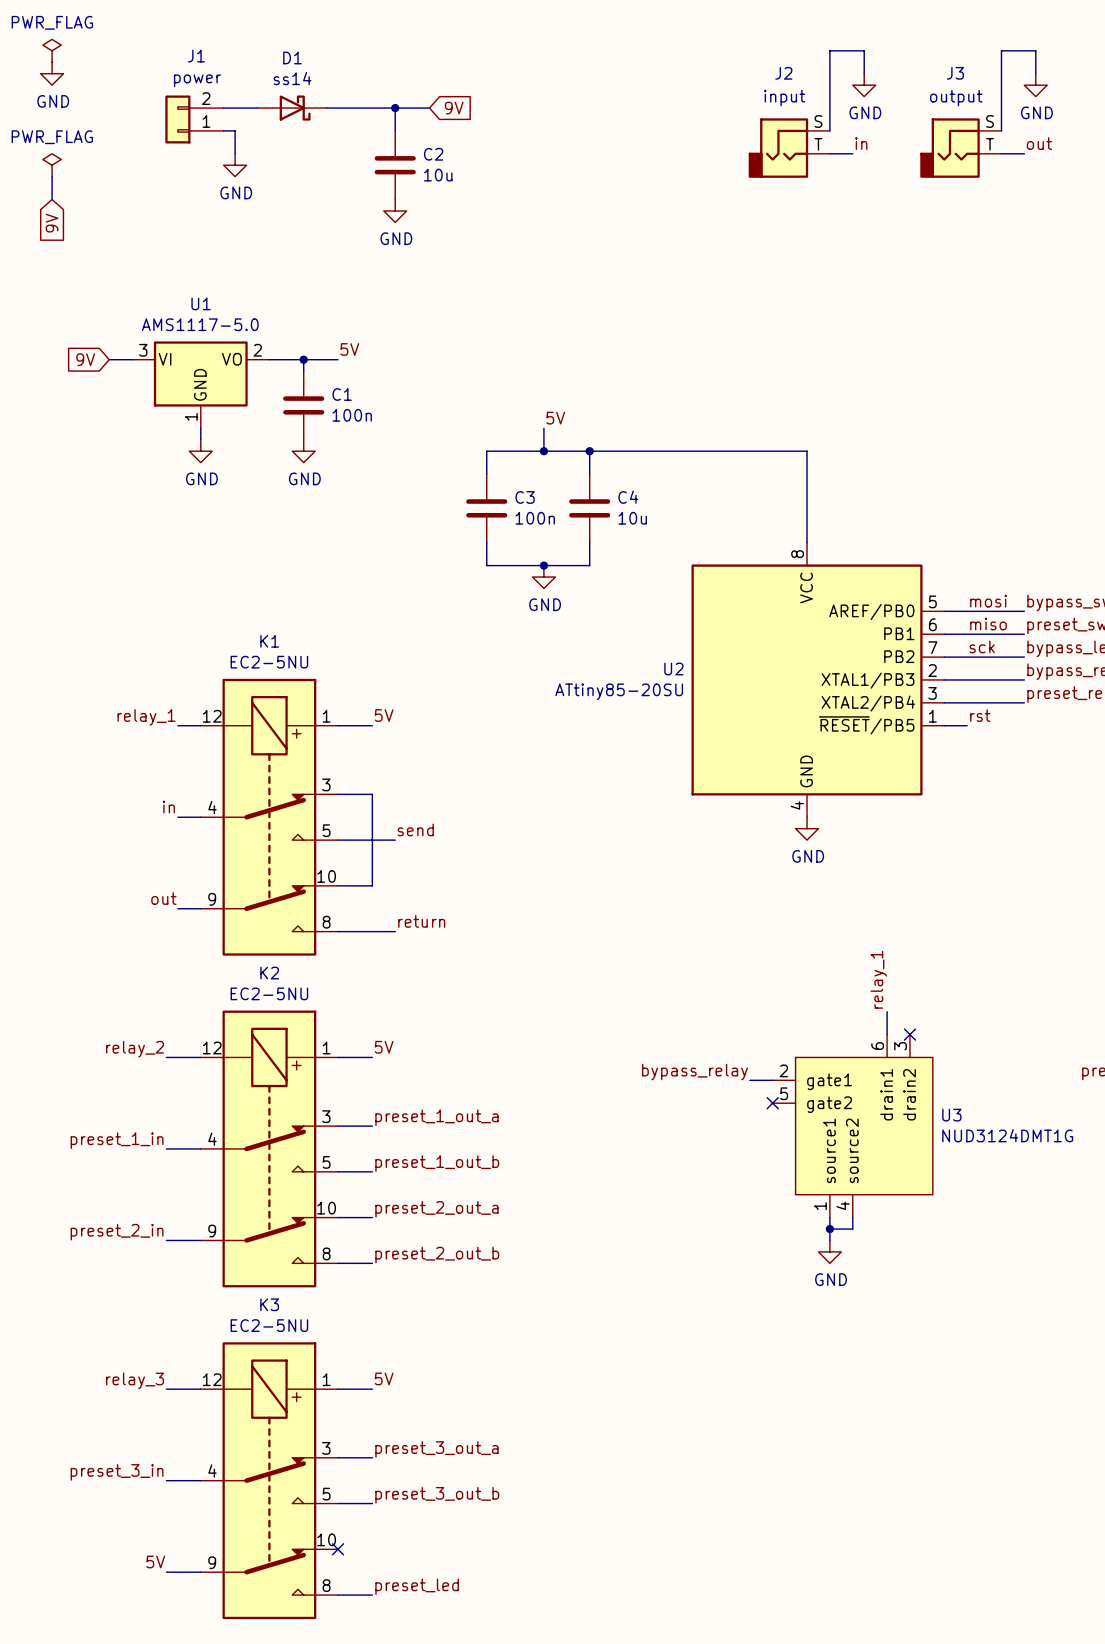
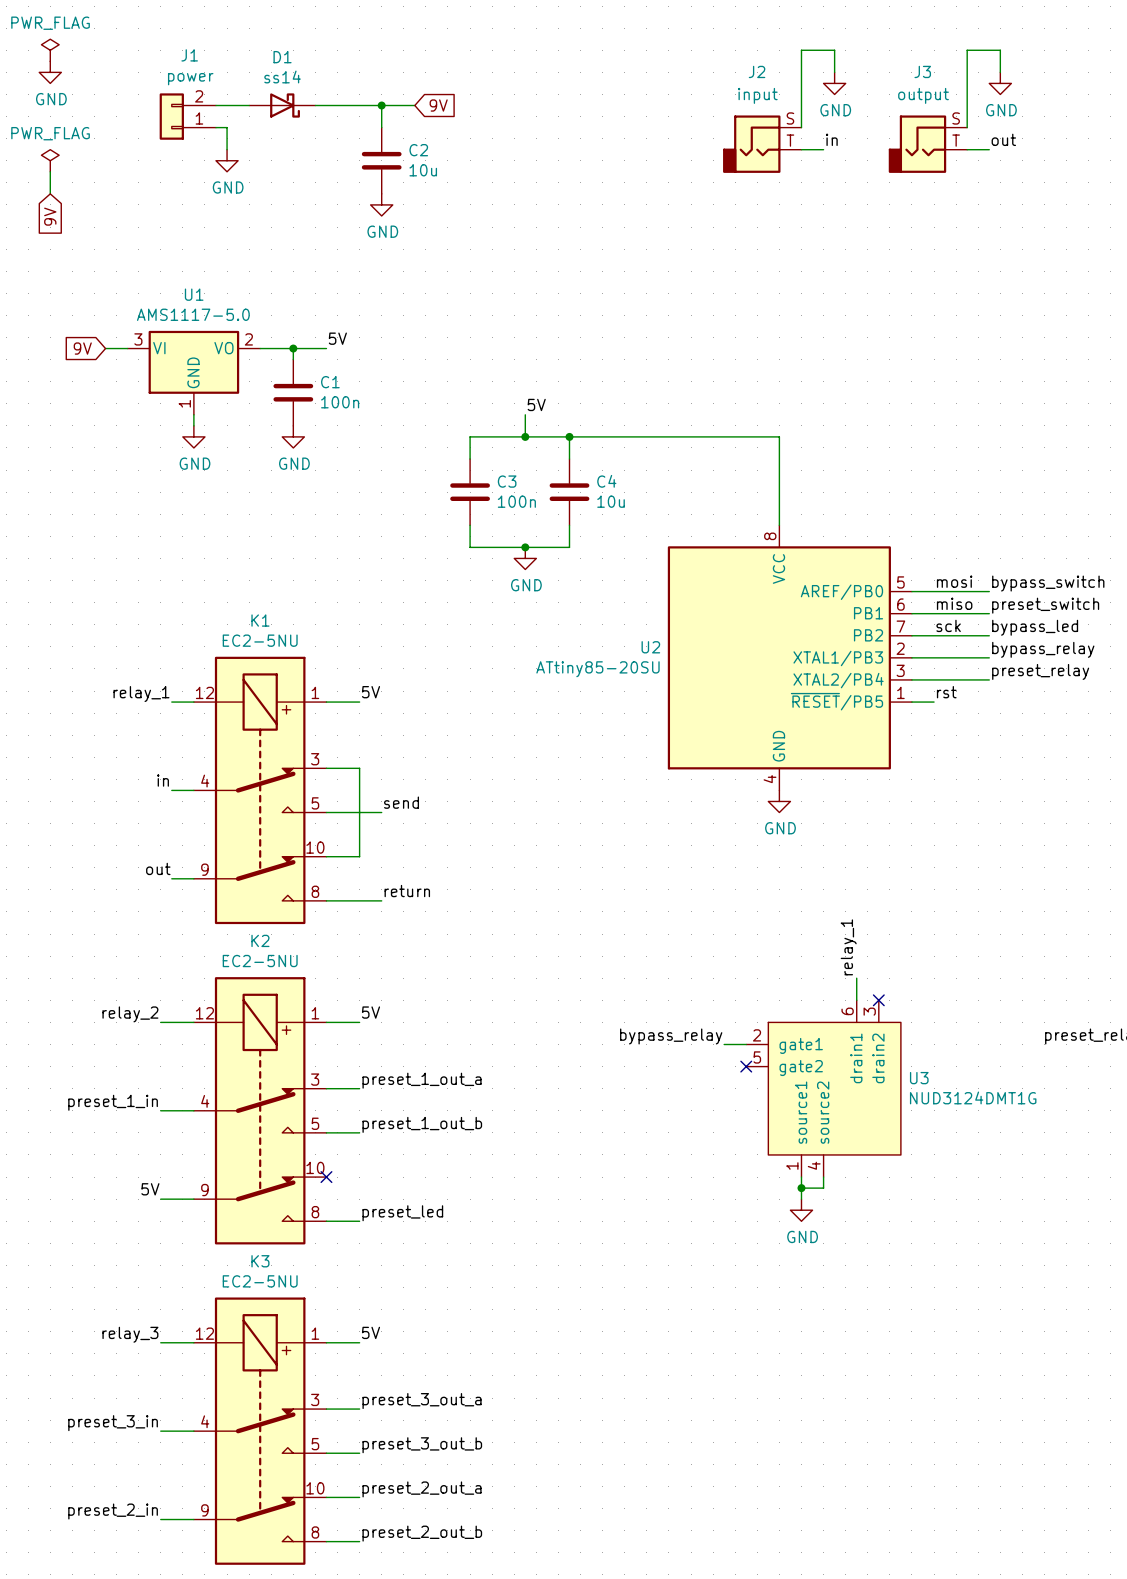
label: preset_2_out_a (436, 1209) -> none
wire: (338, 1217) (372, 1217) -> none
no-connect mark: none -> (326, 1177)
label: preset_2_in (117, 1232) -> 5V (150, 1189)
label: preset_2_out_b (437, 1255) -> preset_led (402, 1213)
label: none -> preset_2_out_a (422, 1489)
wire: none -> (326, 1497) (359, 1497)
no-connect mark: (338, 1549) -> none
label: 5V (155, 1561) -> preset_2_in (113, 1511)
label: preset_led (417, 1586) -> preset_2_out_b (422, 1533)

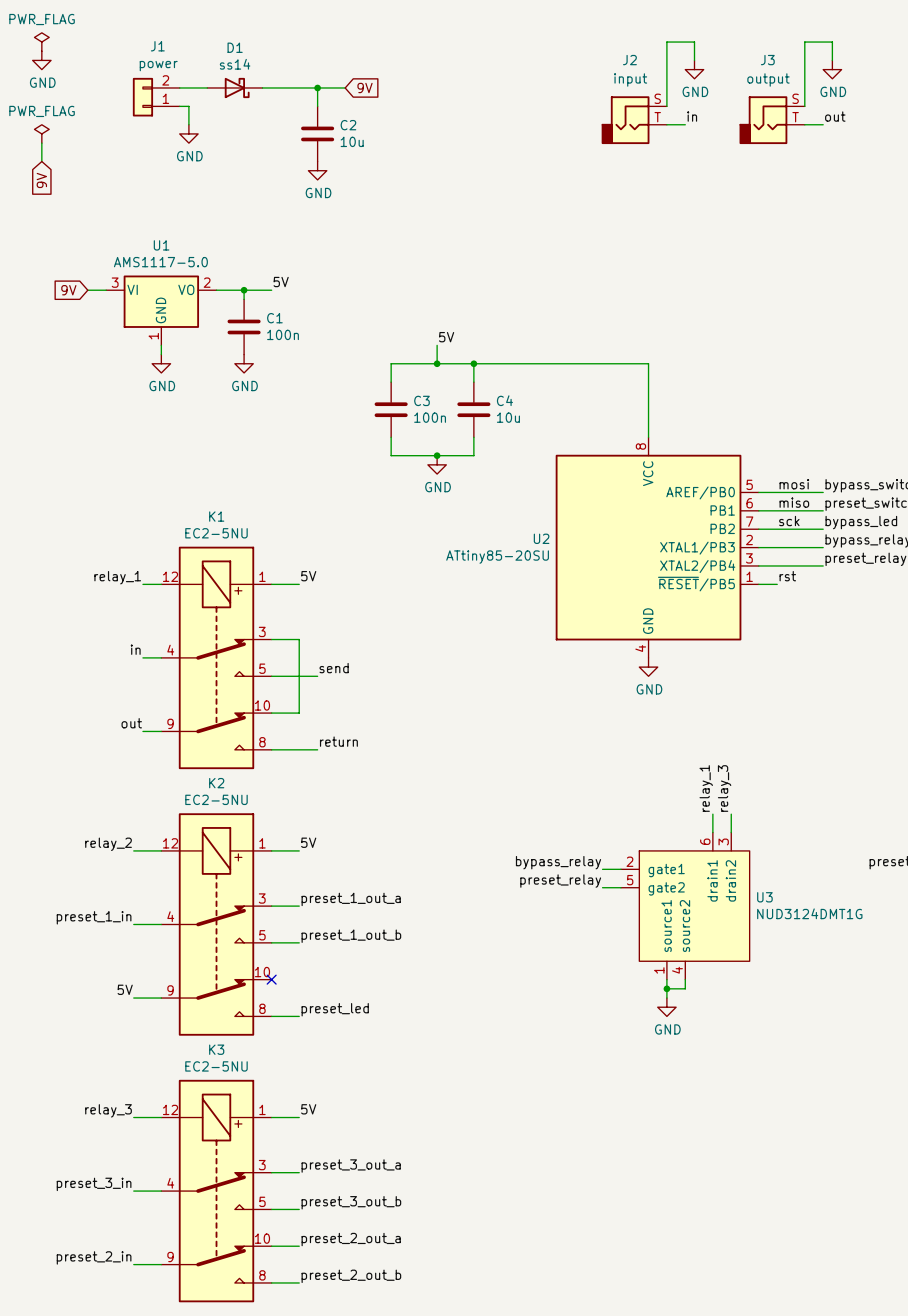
label: none -> relay_3 (724, 788)
wire: none -> (731, 814) (731, 832)
no-connect mark: (878, 1000) -> none
label: none -> preset_relay (560, 881)
wire: none -> (602, 887) (620, 887)
no-connect mark: (746, 1066) -> none

